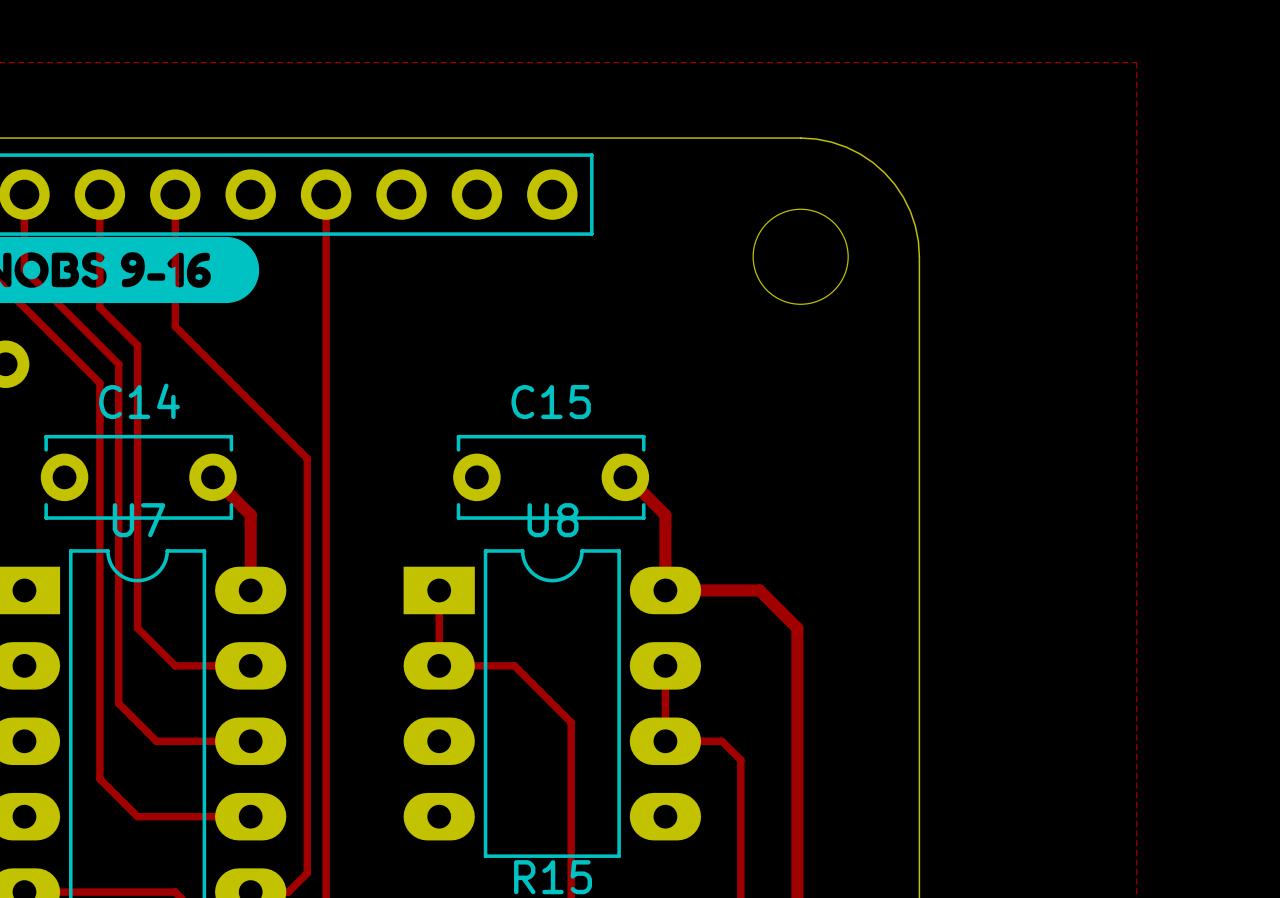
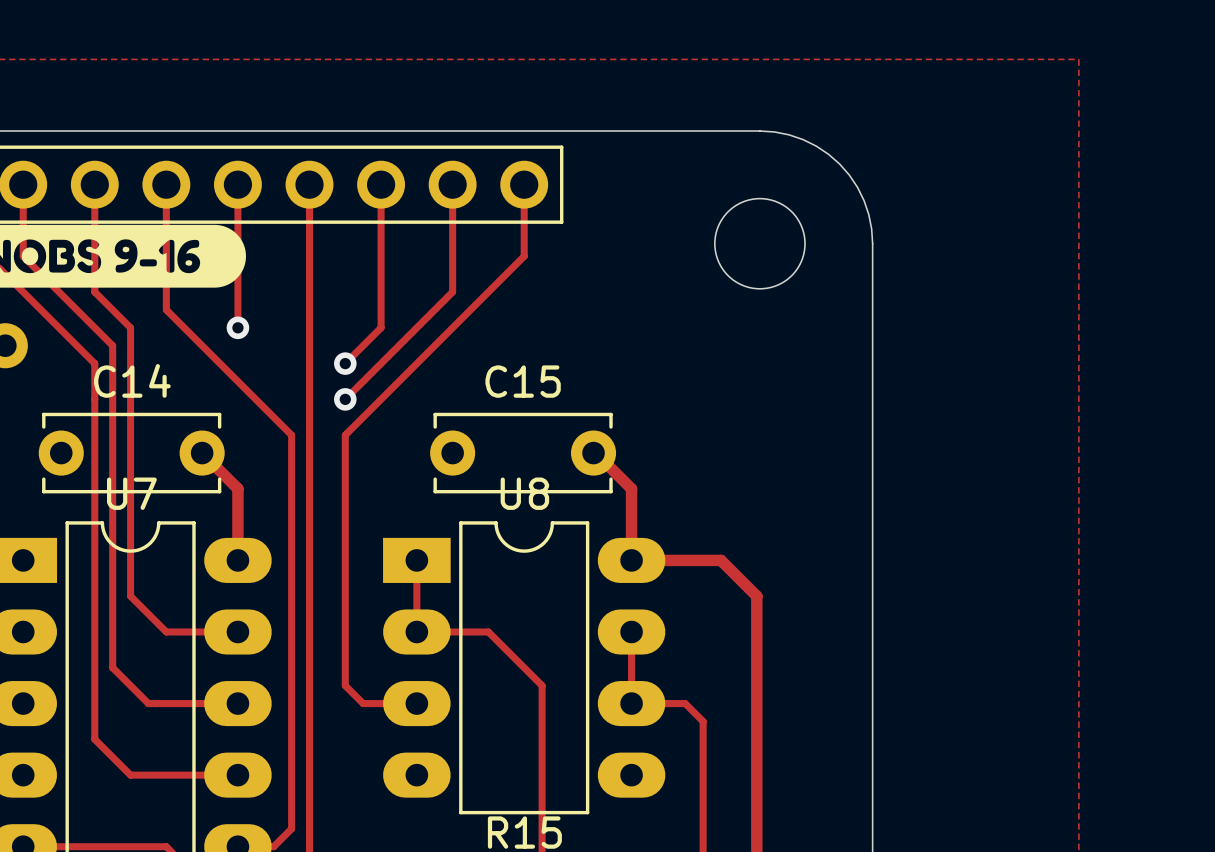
track: none -> (237, 184) (237, 327)
track: none -> (381, 184) (381, 327) (345, 363)
track: none -> (452, 184) (452, 292) (345, 399)
track: none -> (524, 184) (524, 256) (345, 435) (345, 685) (363, 703) (416, 703)
via: none -> (237, 327)
via: none -> (345, 363)
via: none -> (345, 399)

